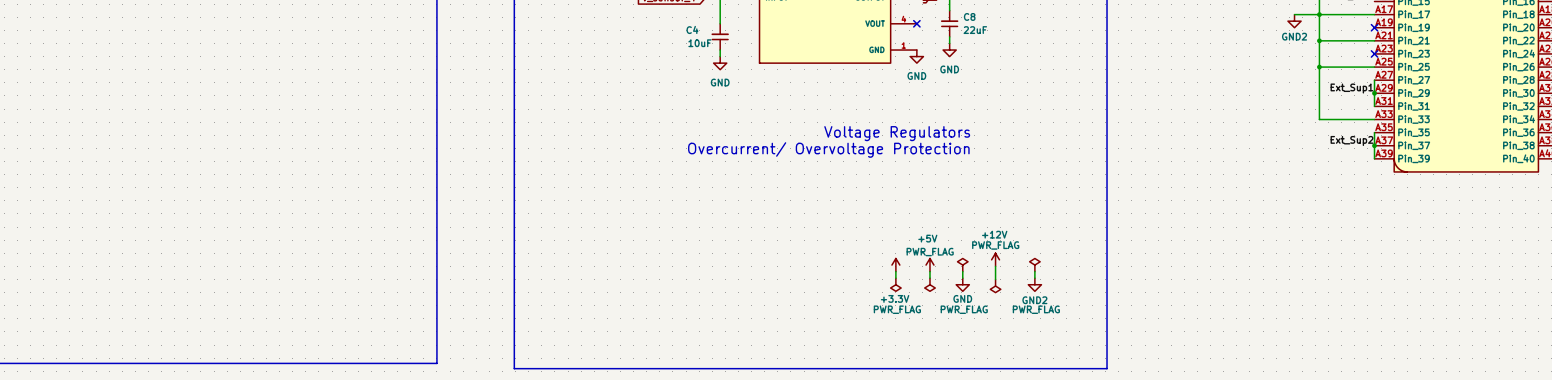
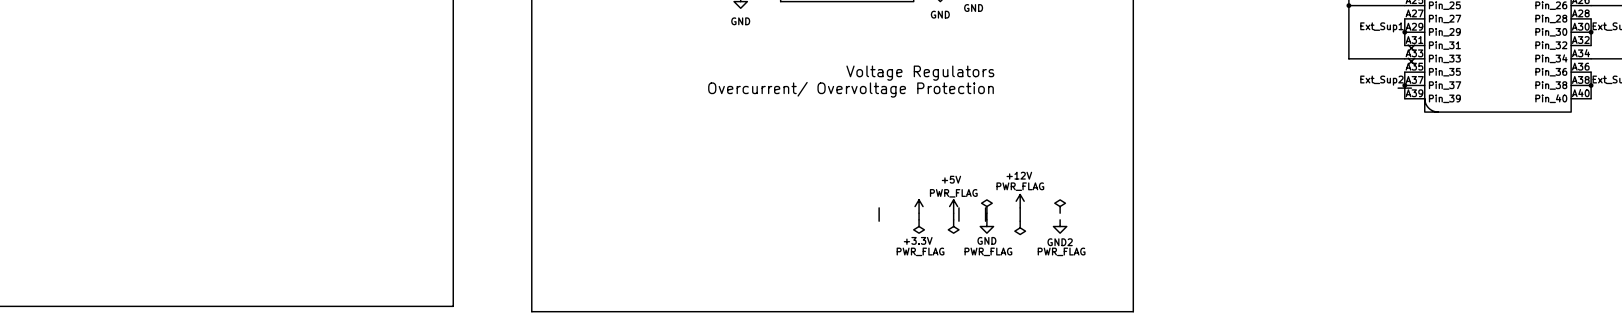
no-connect mark: none -> (1411, 48)
no-connect mark: none -> (1411, 61)
wire: none -> (1398, 88) (1411, 88)
wire: none -> (879, 207) (879, 221)
wire: none -> (958, 207) (958, 221)
wire: none -> (985, 207) (985, 221)
wire: (1034, 271) (1034, 278) -> none

